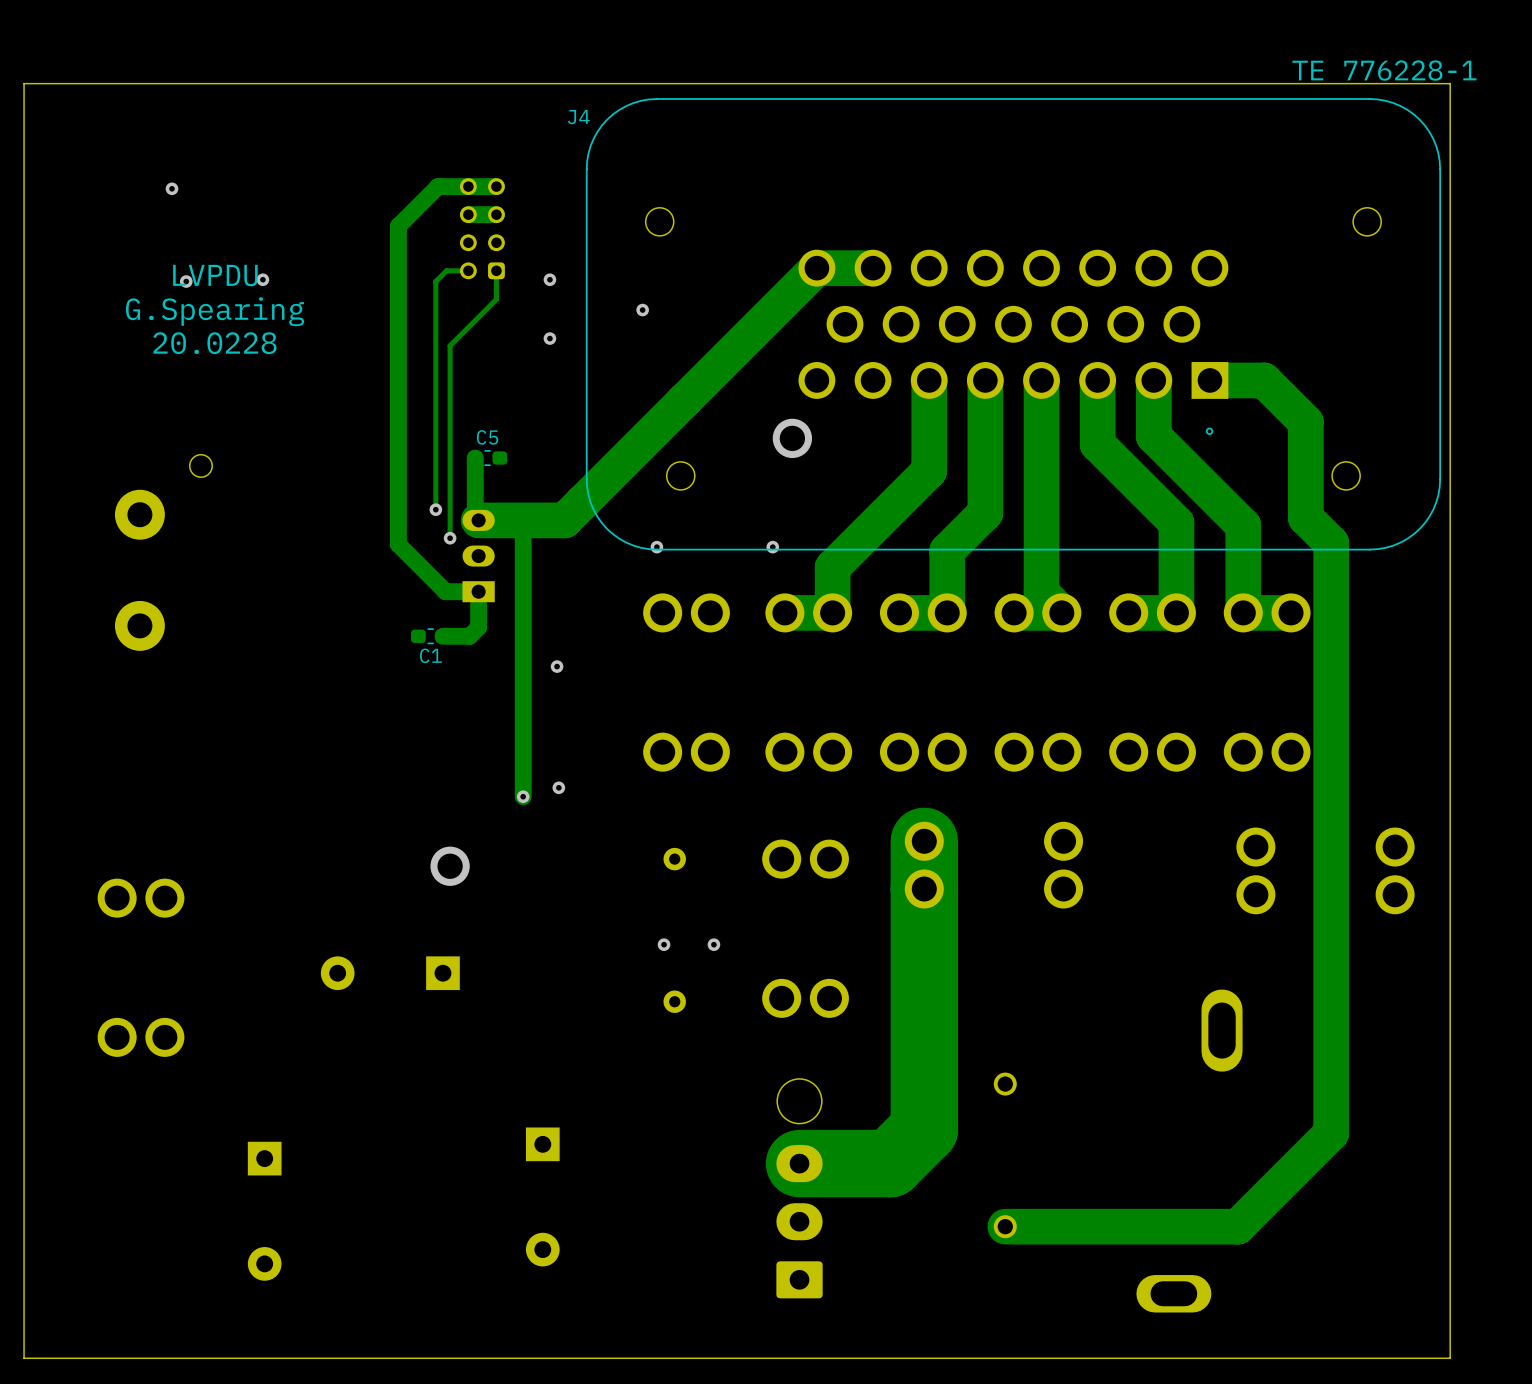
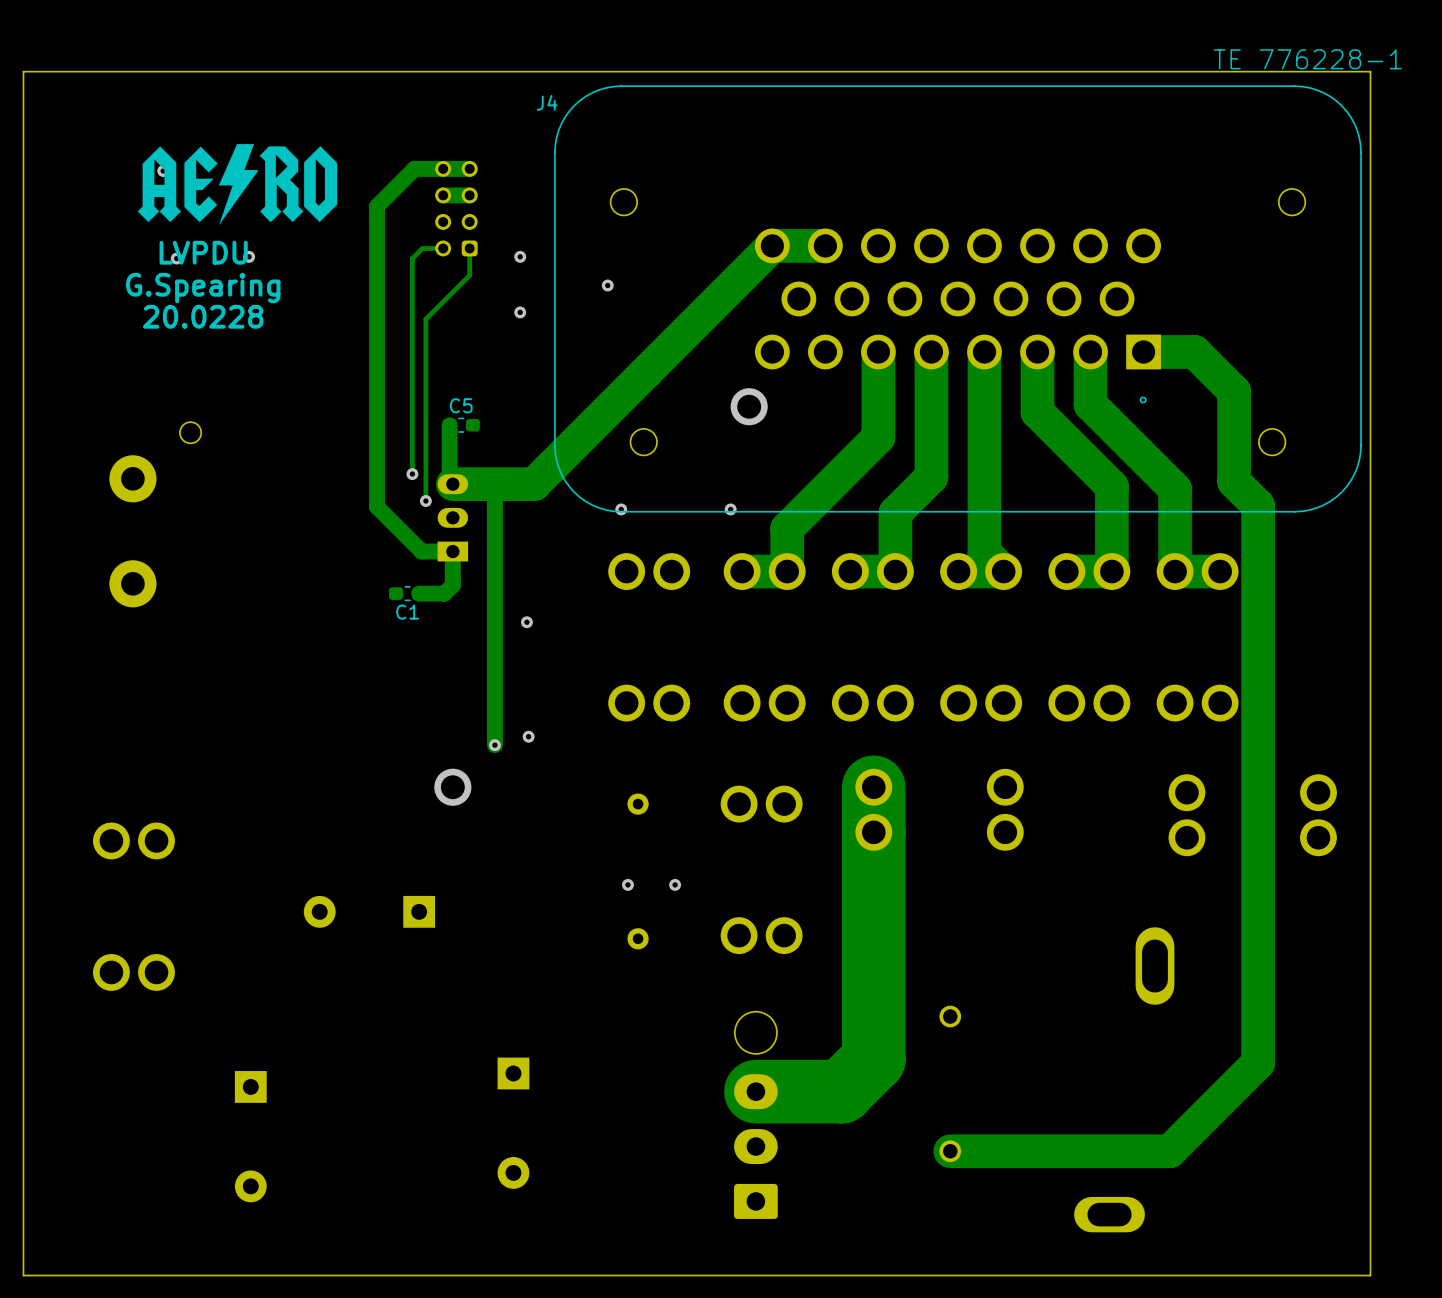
drawing: none -> [137, 144, 338, 225]
via position: (450, 866) -> (452, 787)

